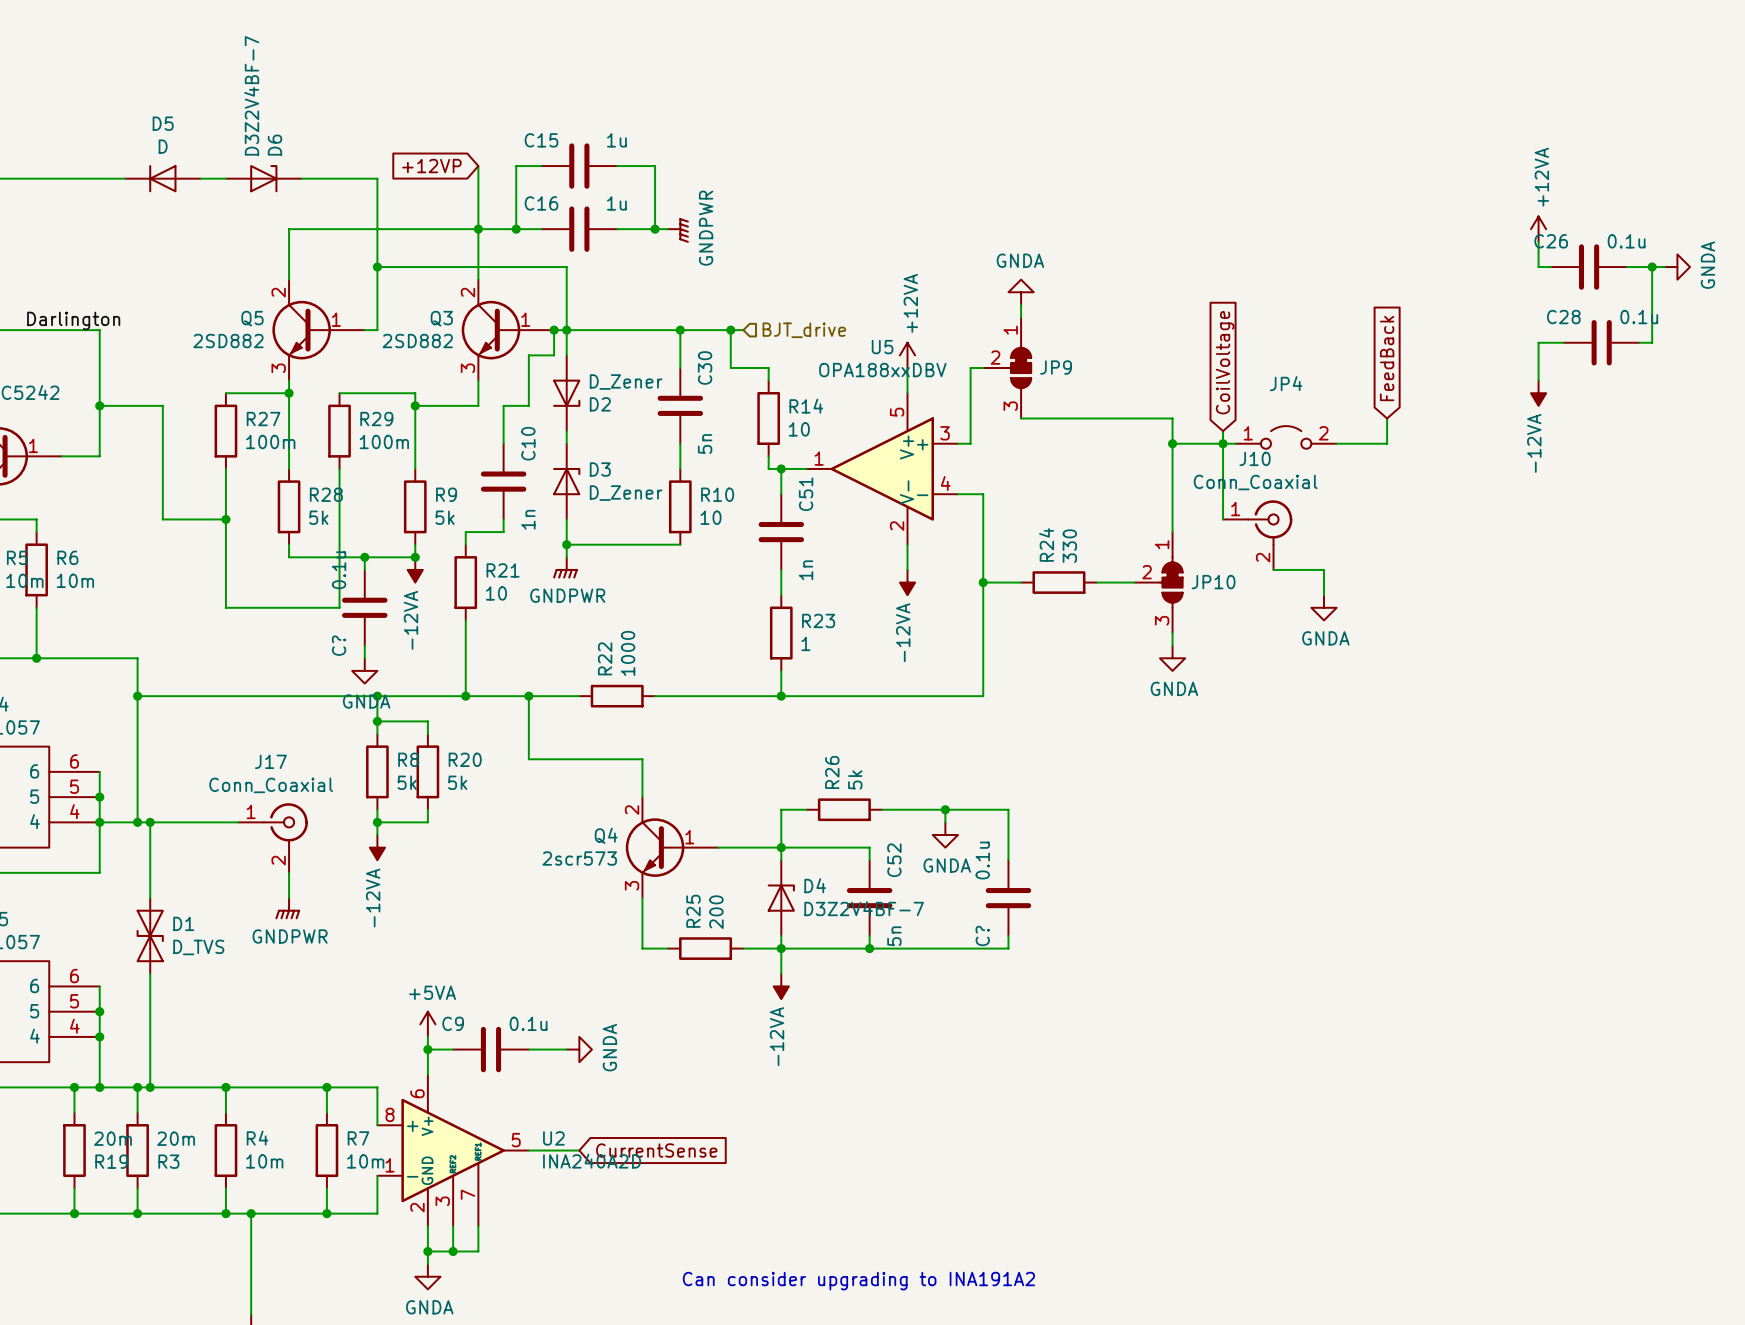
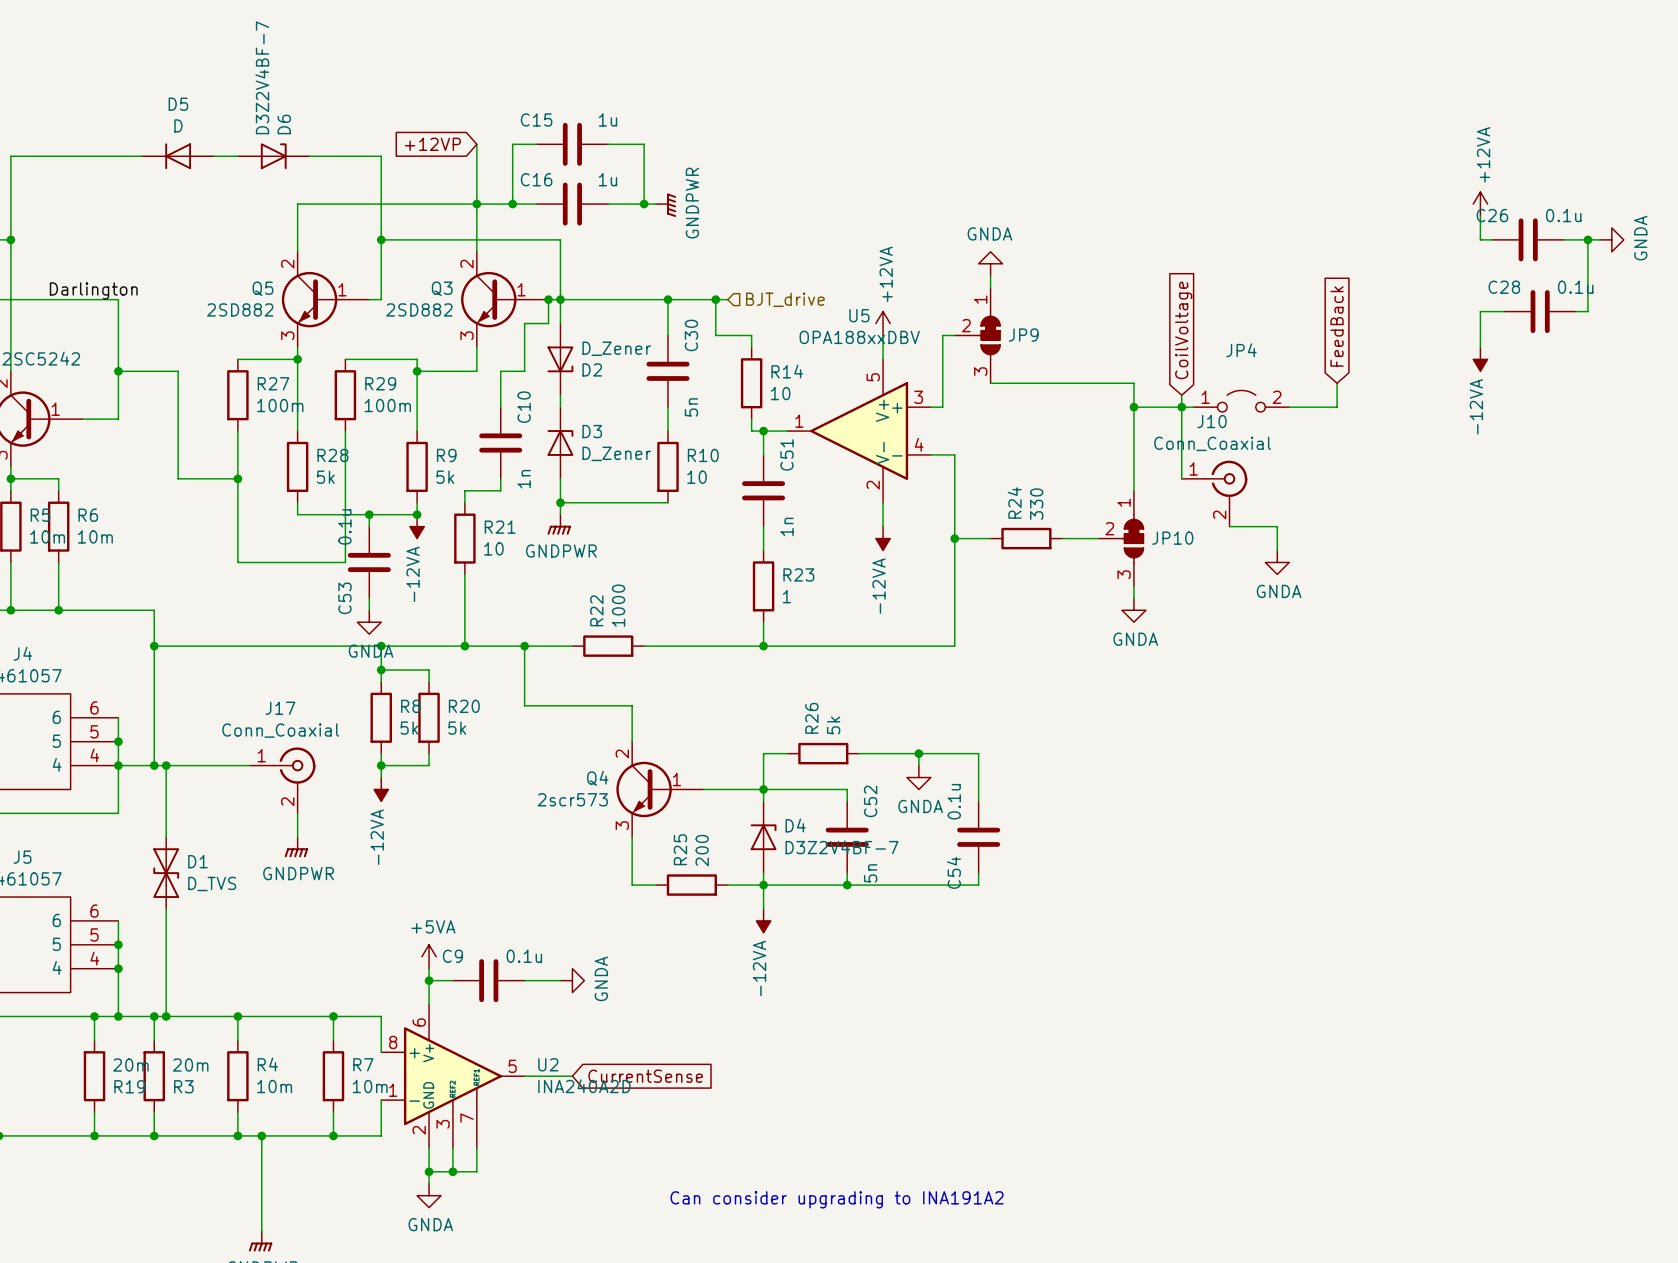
C? name: C? (339, 645) -> C53 (344, 598)
C? name: C? (982, 935) -> C54 (953, 872)

